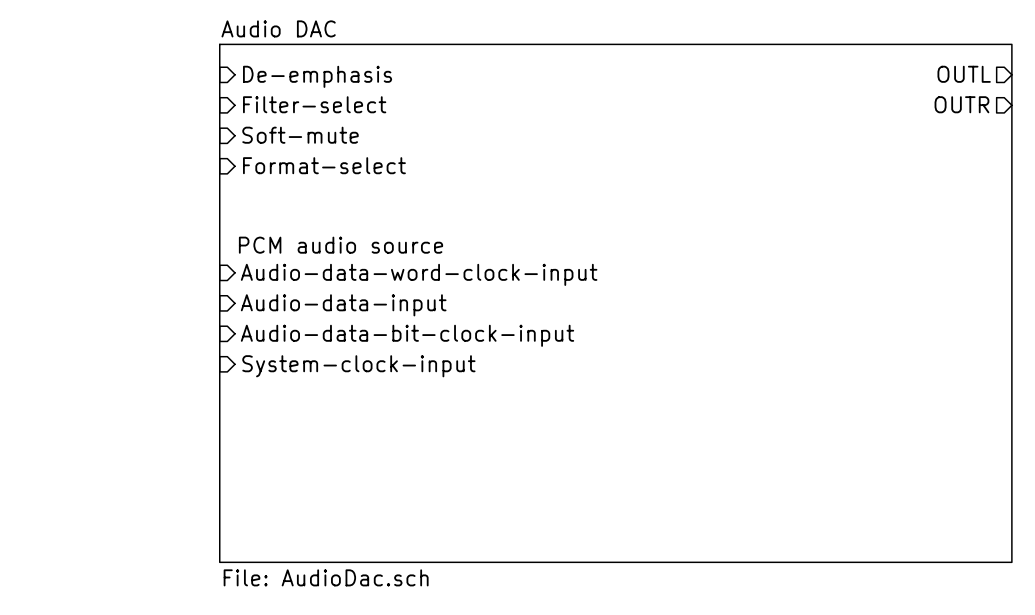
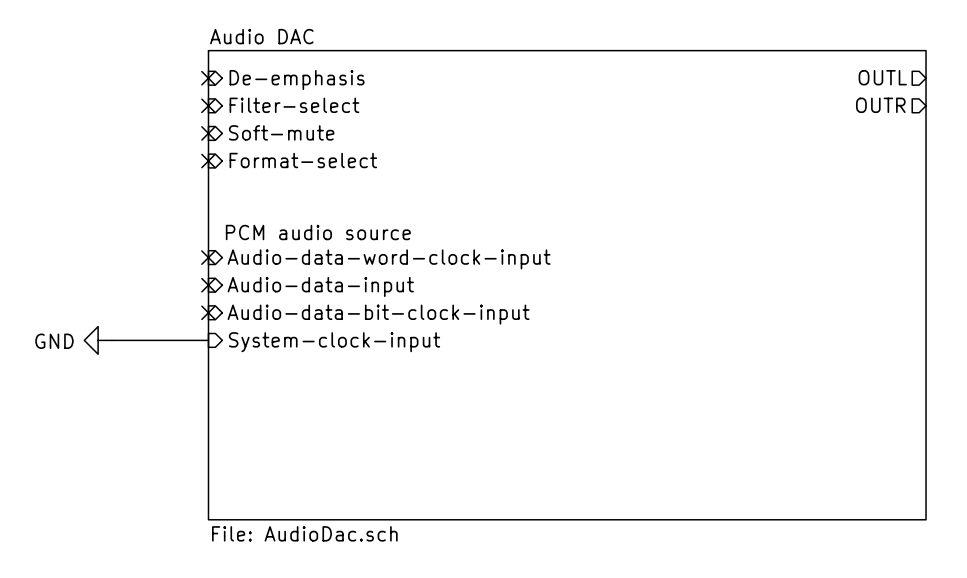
no-connect mark: none -> (208, 78)
no-connect mark: none -> (208, 105)
no-connect mark: none -> (208, 133)
no-connect mark: none -> (208, 161)
no-connect mark: none -> (208, 257)
no-connect mark: none -> (208, 285)
no-connect mark: none -> (208, 312)
power symbol: none -> GND (98, 340)
wire: none -> (111, 340) (208, 340)

